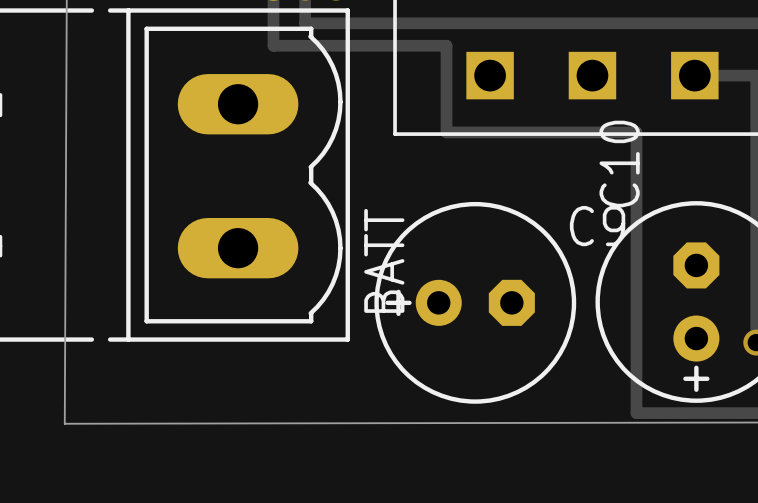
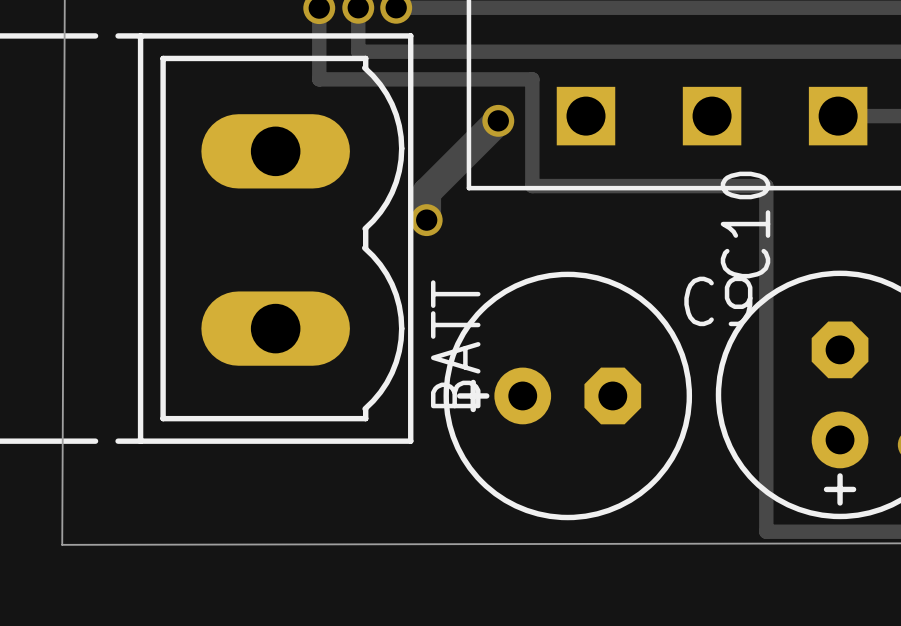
track: none -> (498, 120) (426, 192) (426, 220)
via: none -> (498, 120)
via: none -> (426, 220)

